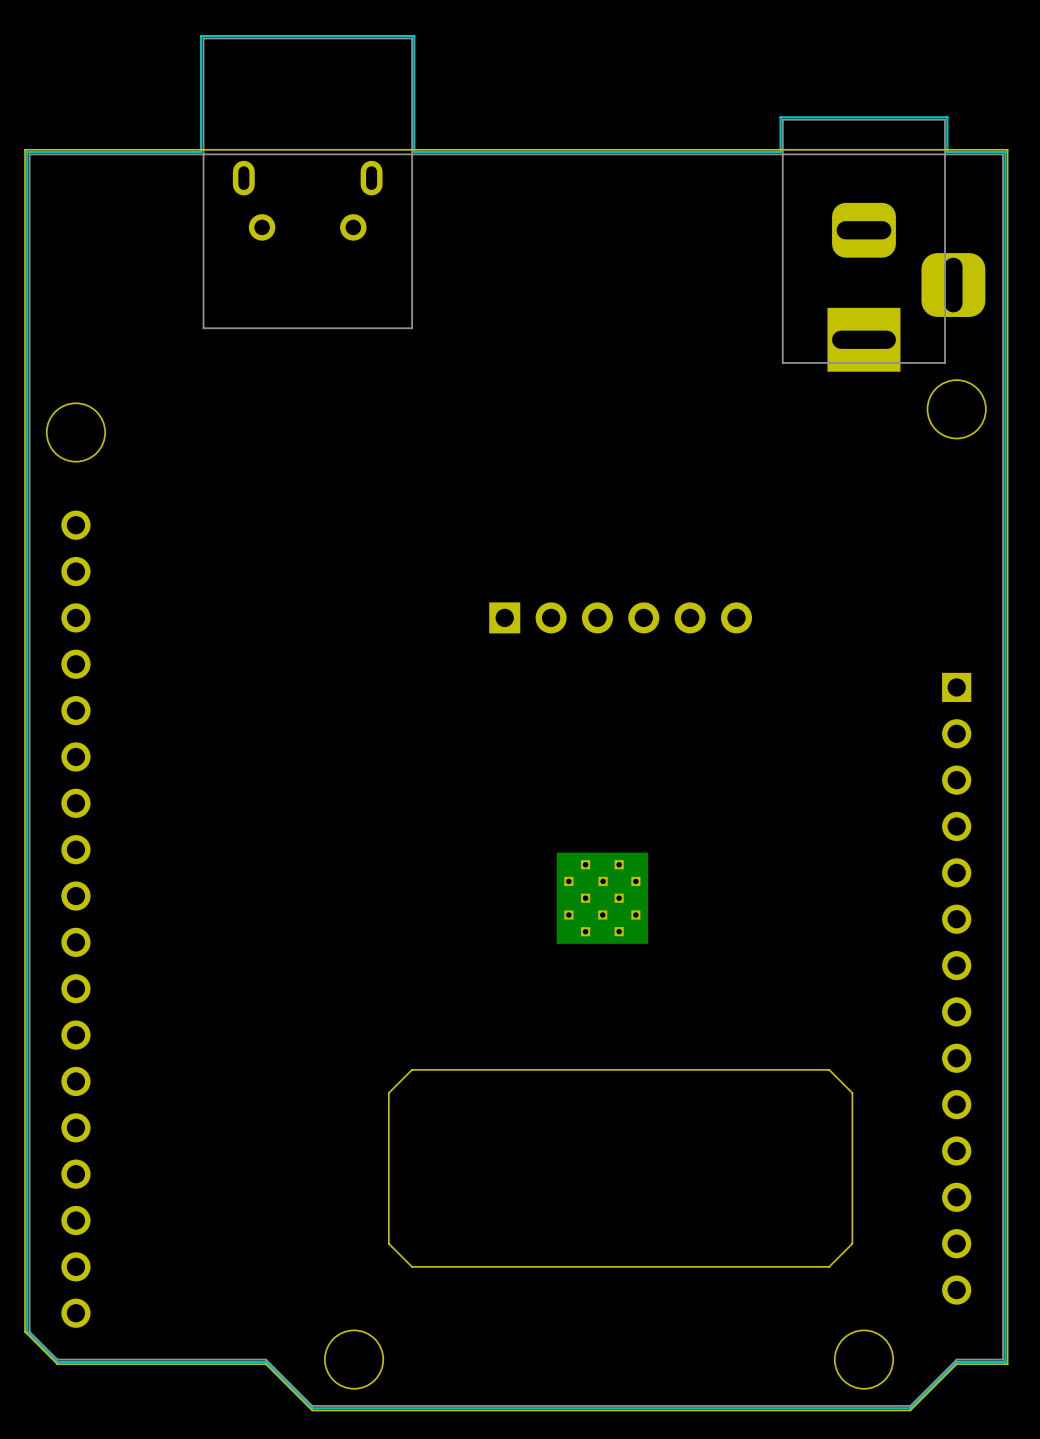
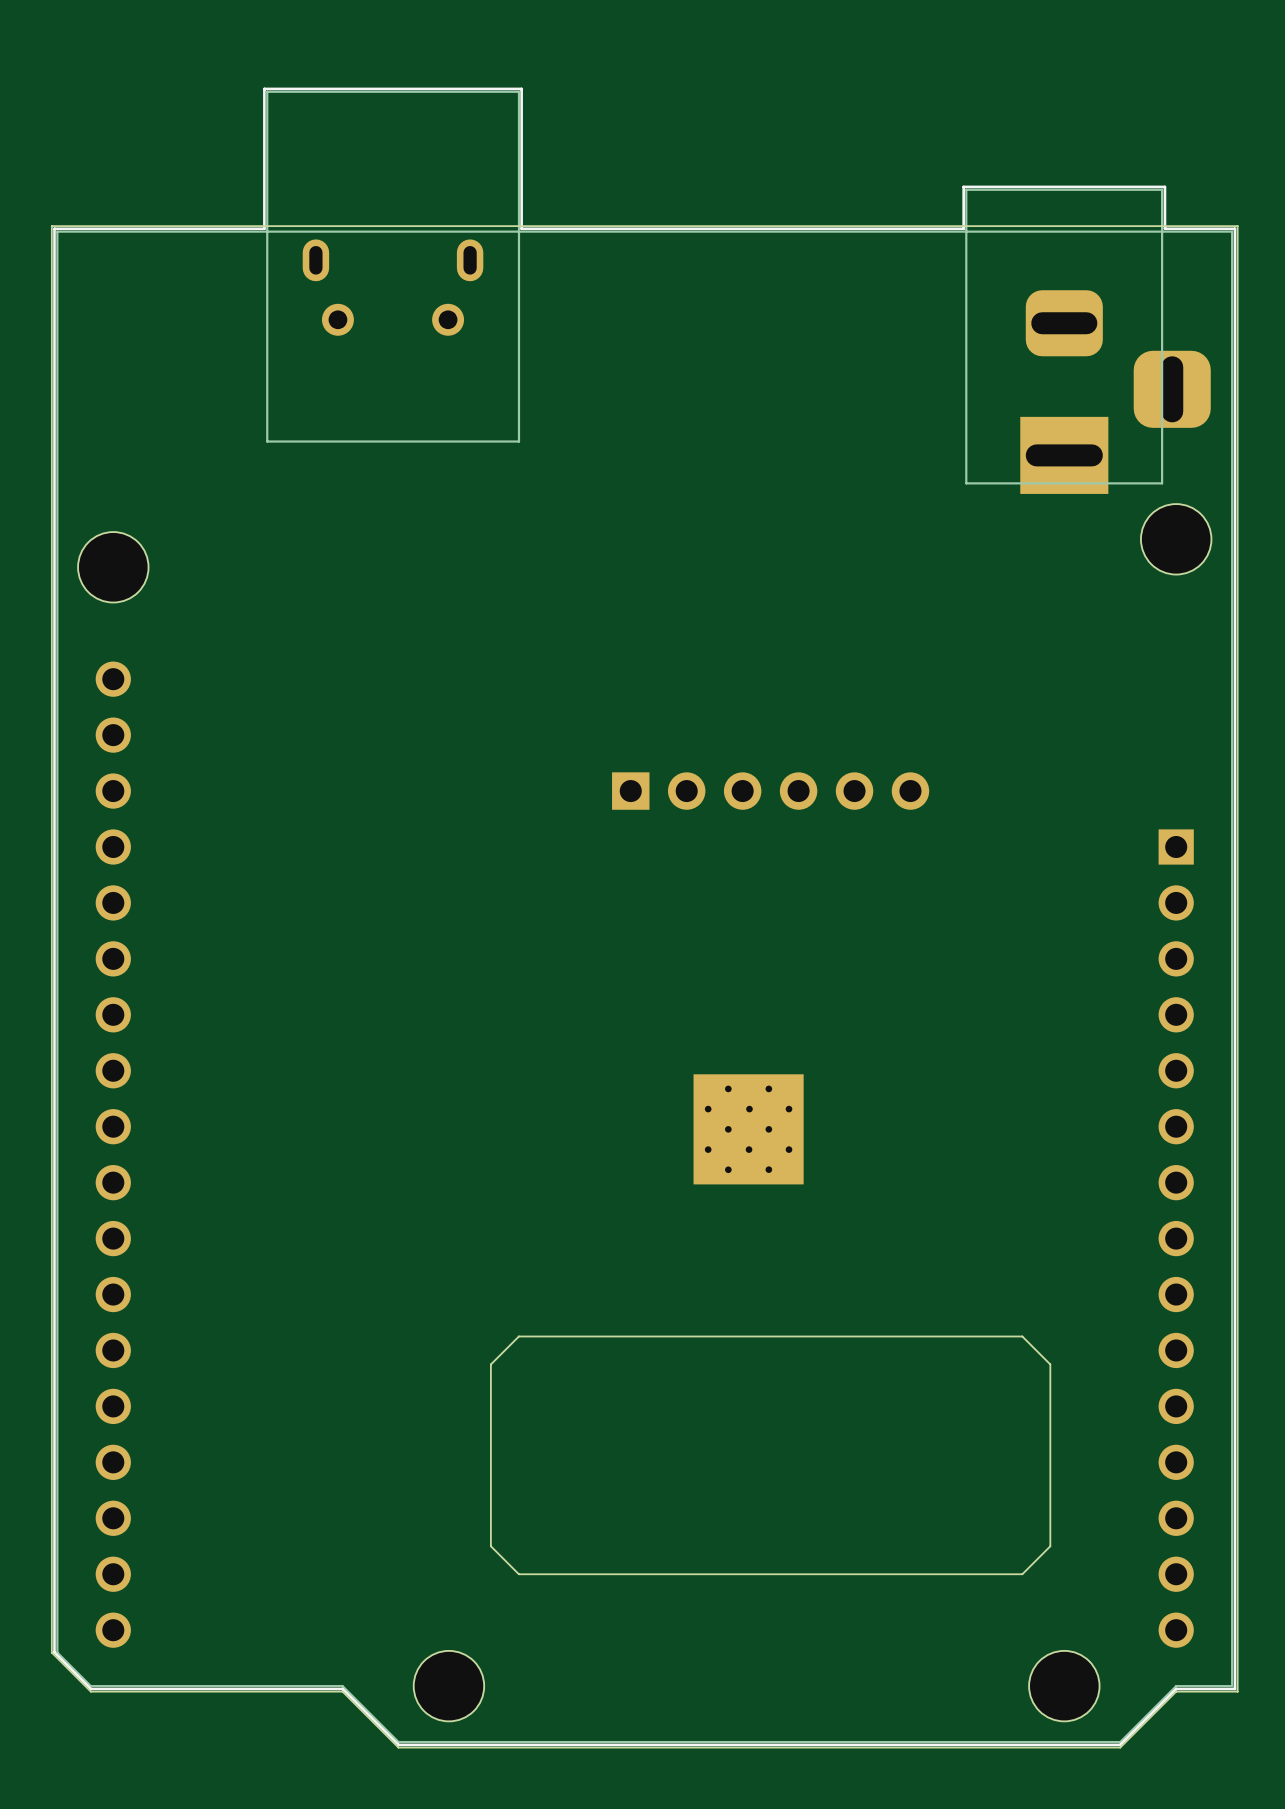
part footprint: [26, 35, 1007, 1410] -> [53, 87, 1237, 1747]

